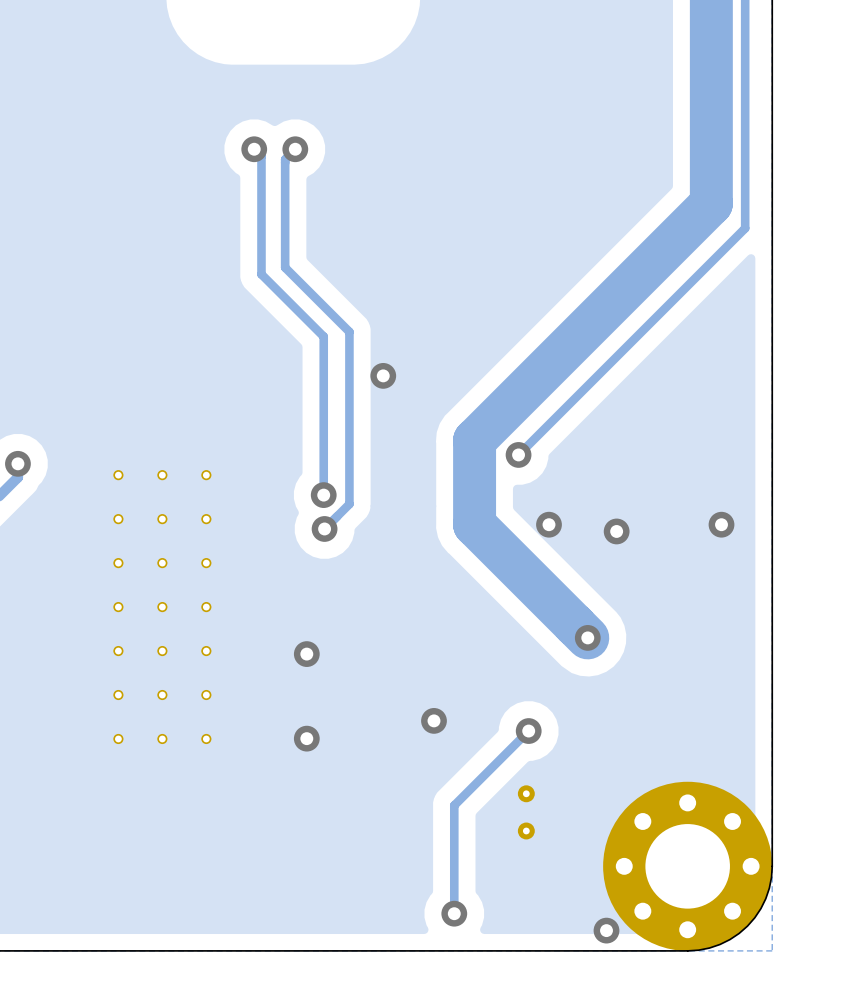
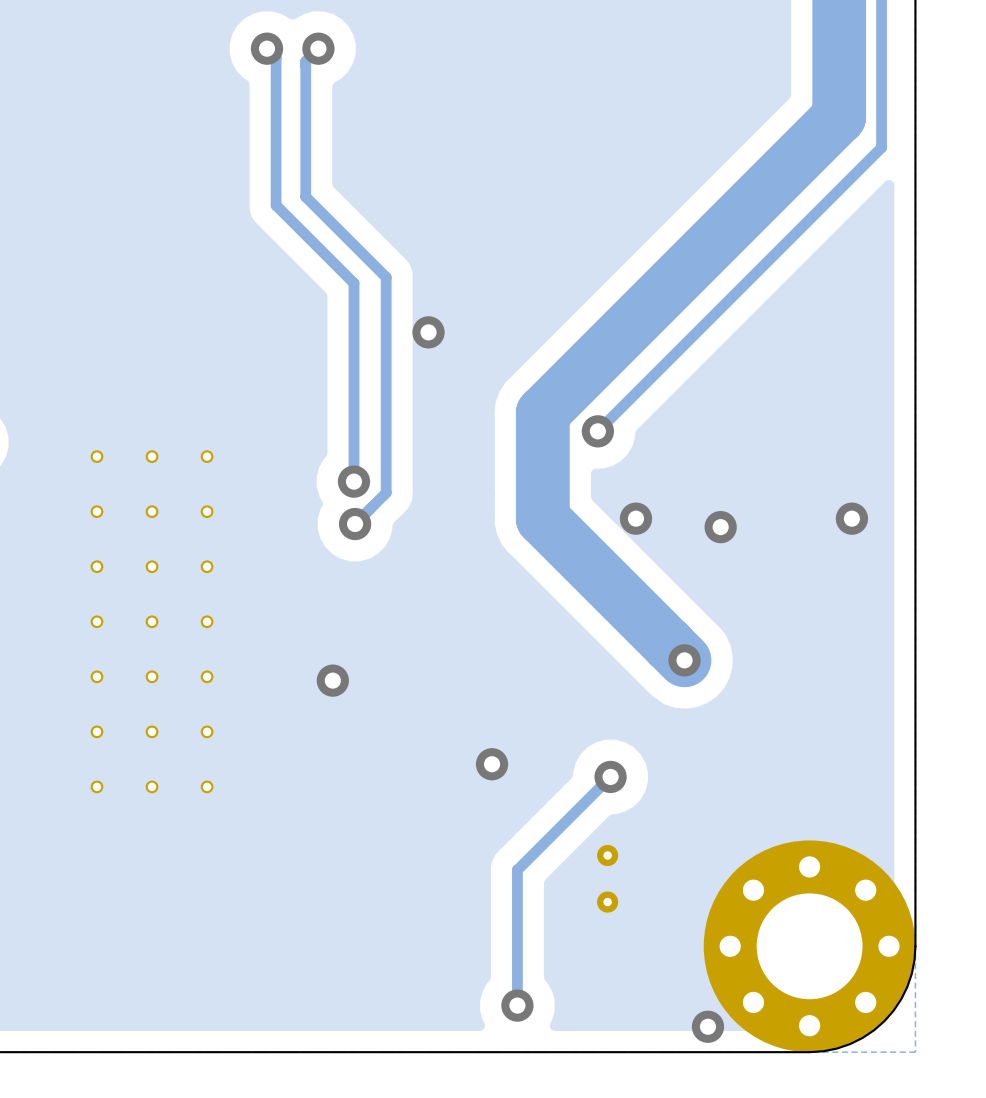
via: (306, 738) -> none

